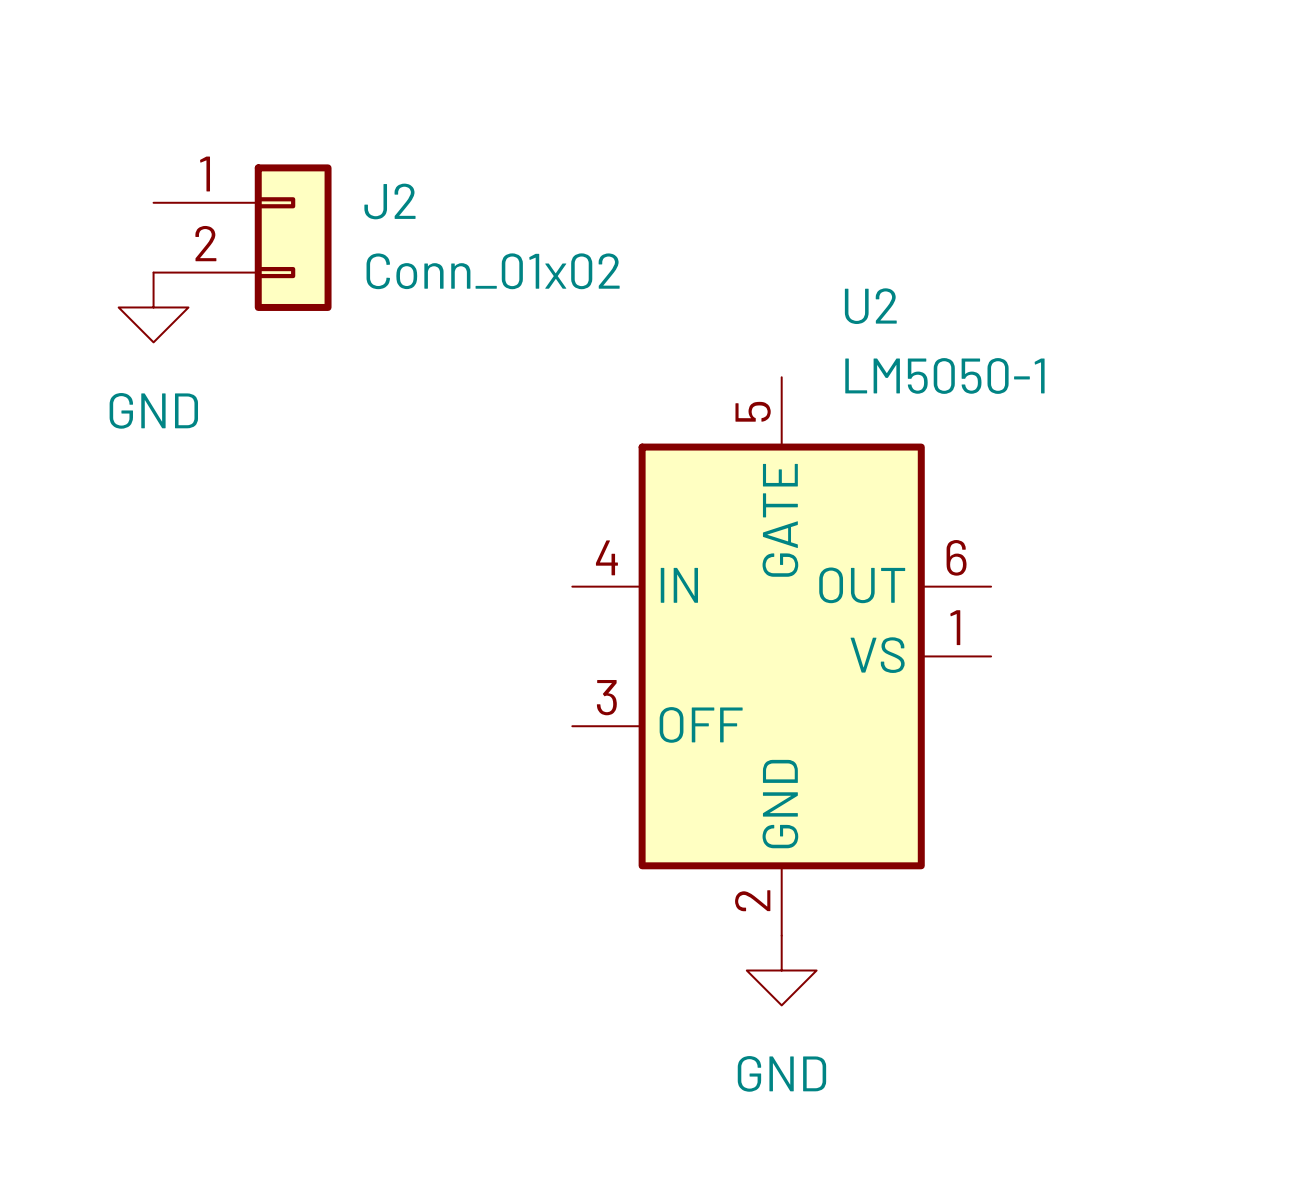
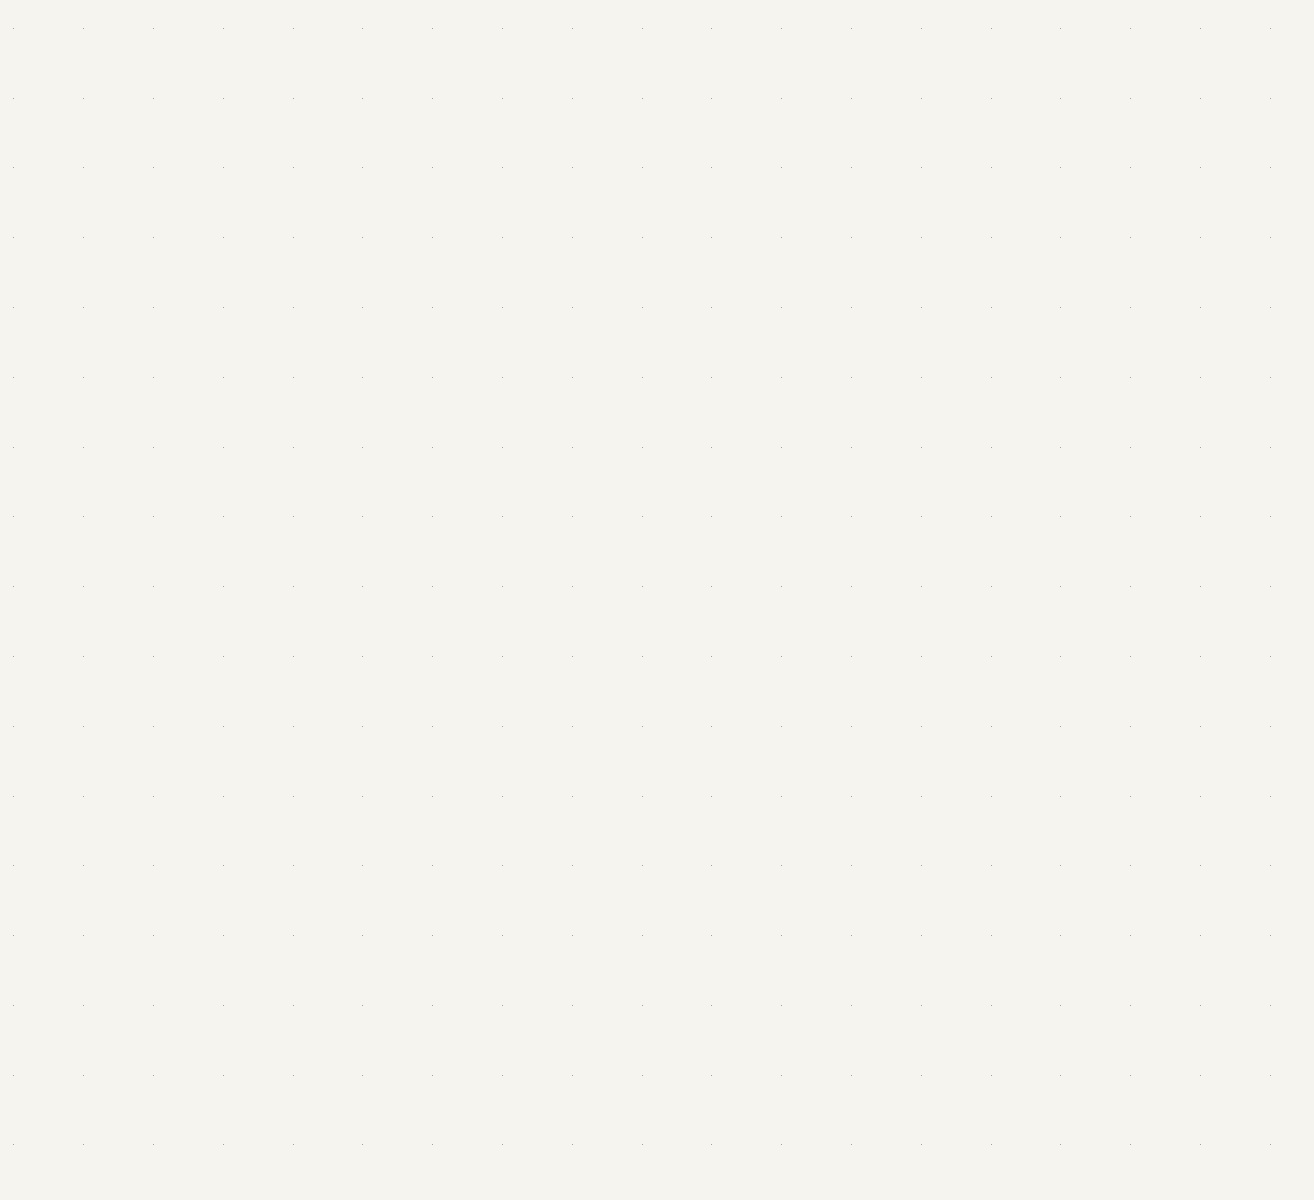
J2: Conn_01x02 (242, 237) -> none
power symbol: GND (153, 307) -> none
U2: LM5050-1 (781, 656) -> none
power symbol: GND (781, 970) -> none

